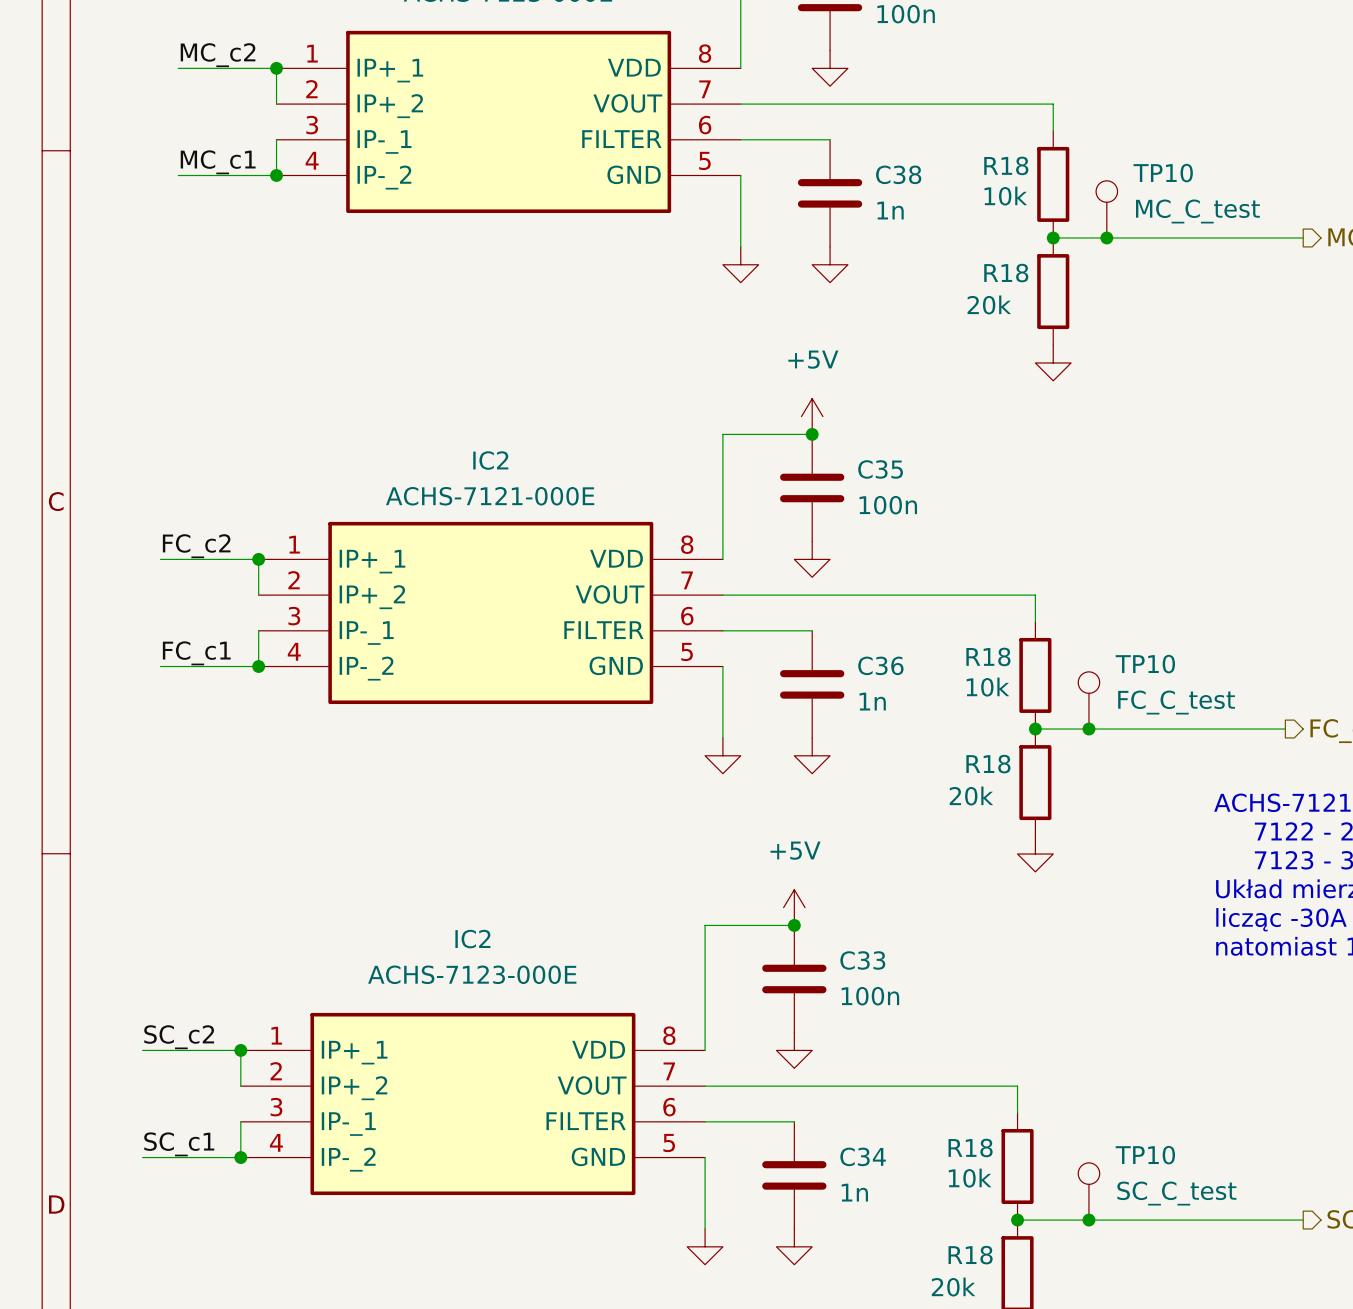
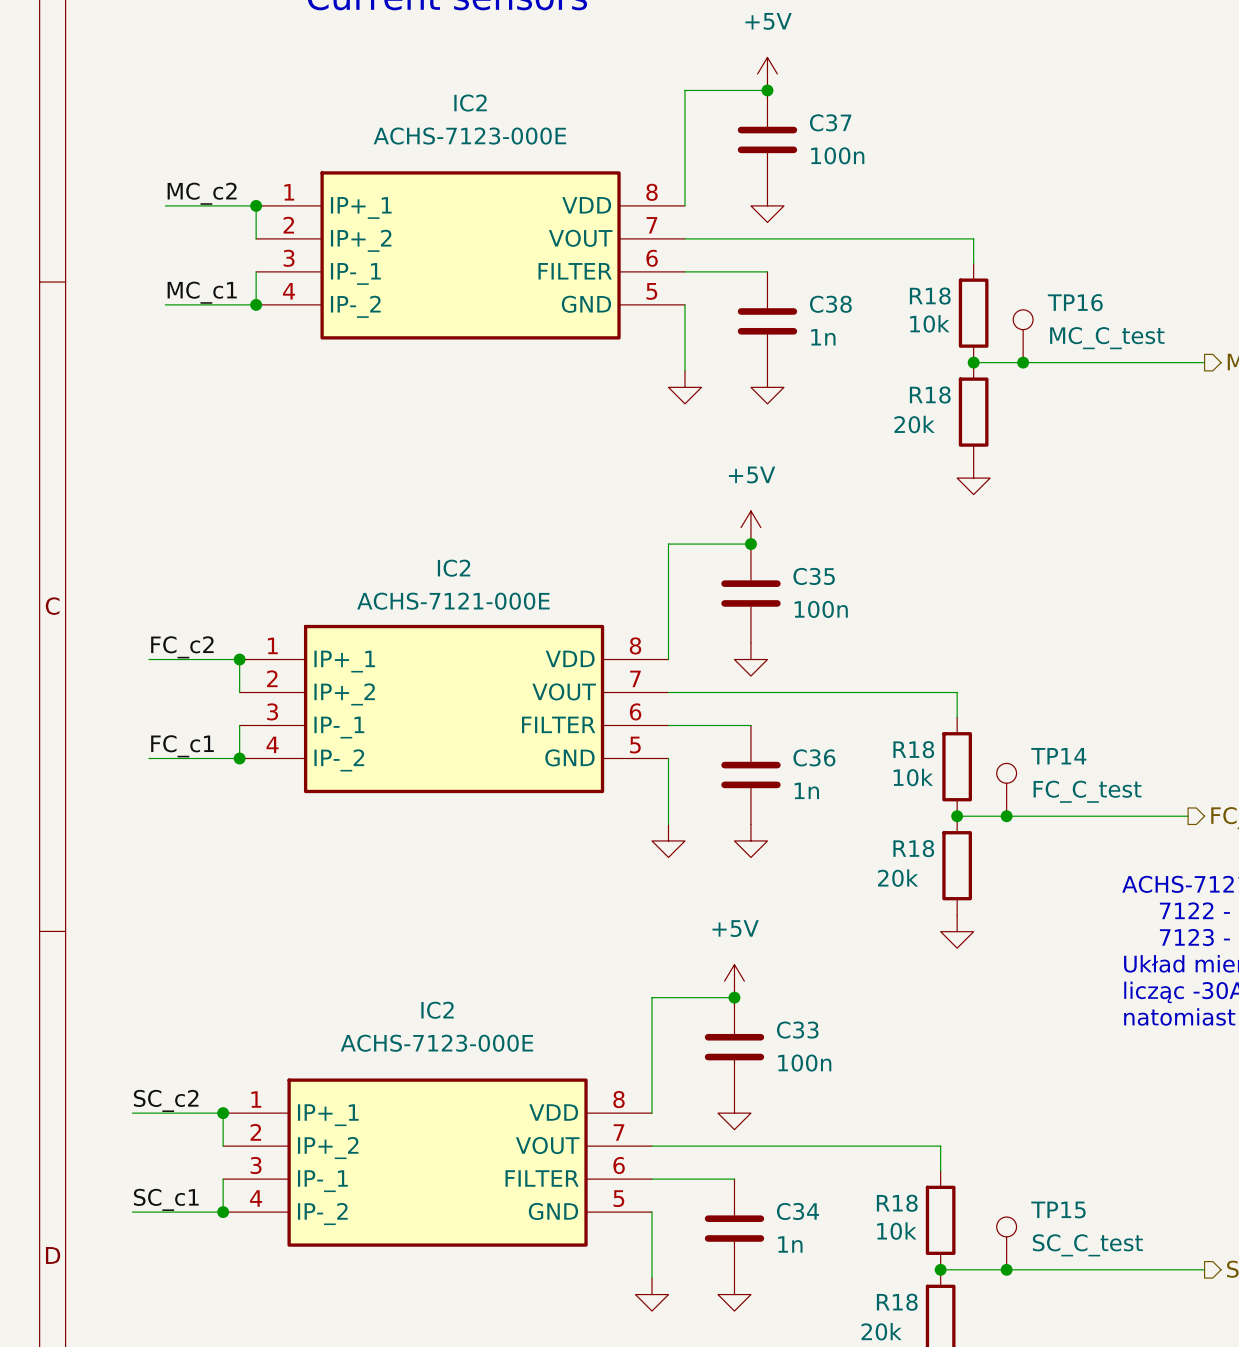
TP10 name: TP10 (1163, 173) -> TP16 (1075, 302)
TP10 name: TP10 (1145, 664) -> TP14 (1058, 756)
TP10 name: TP10 (1145, 1155) -> TP15 (1058, 1209)

